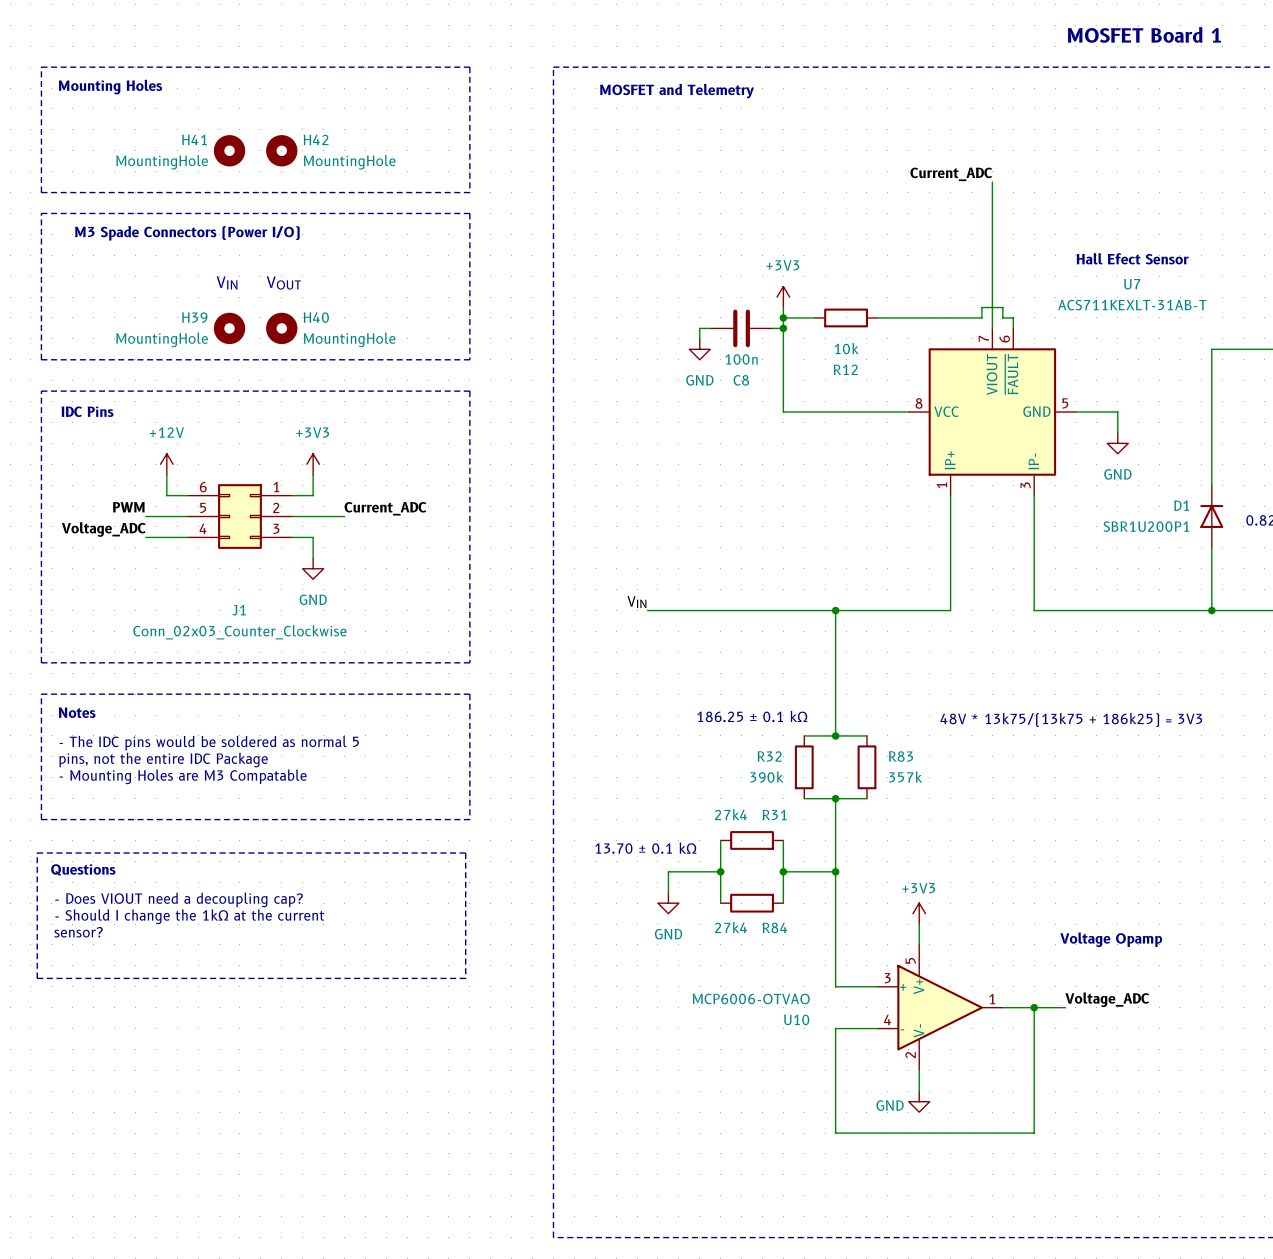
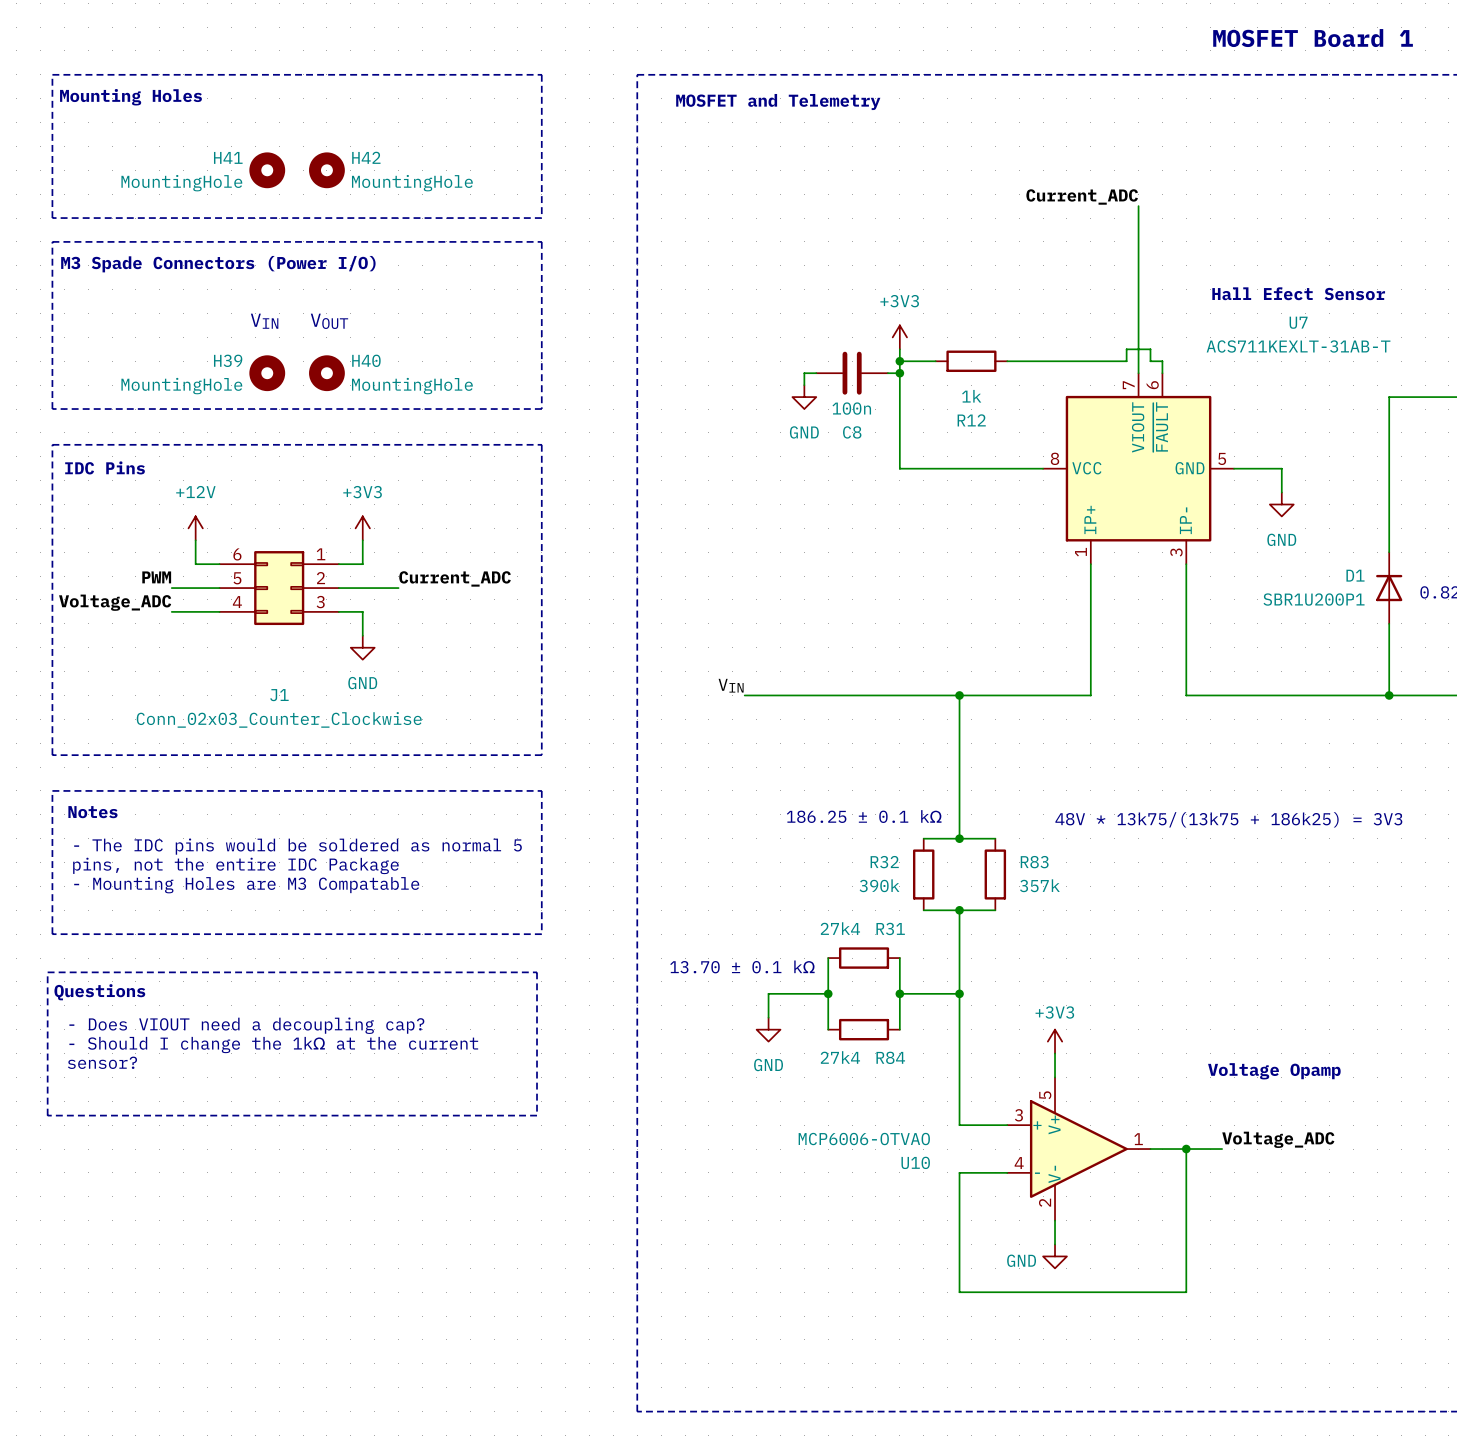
R12 value: 10k (846, 348) -> 1k (971, 396)

